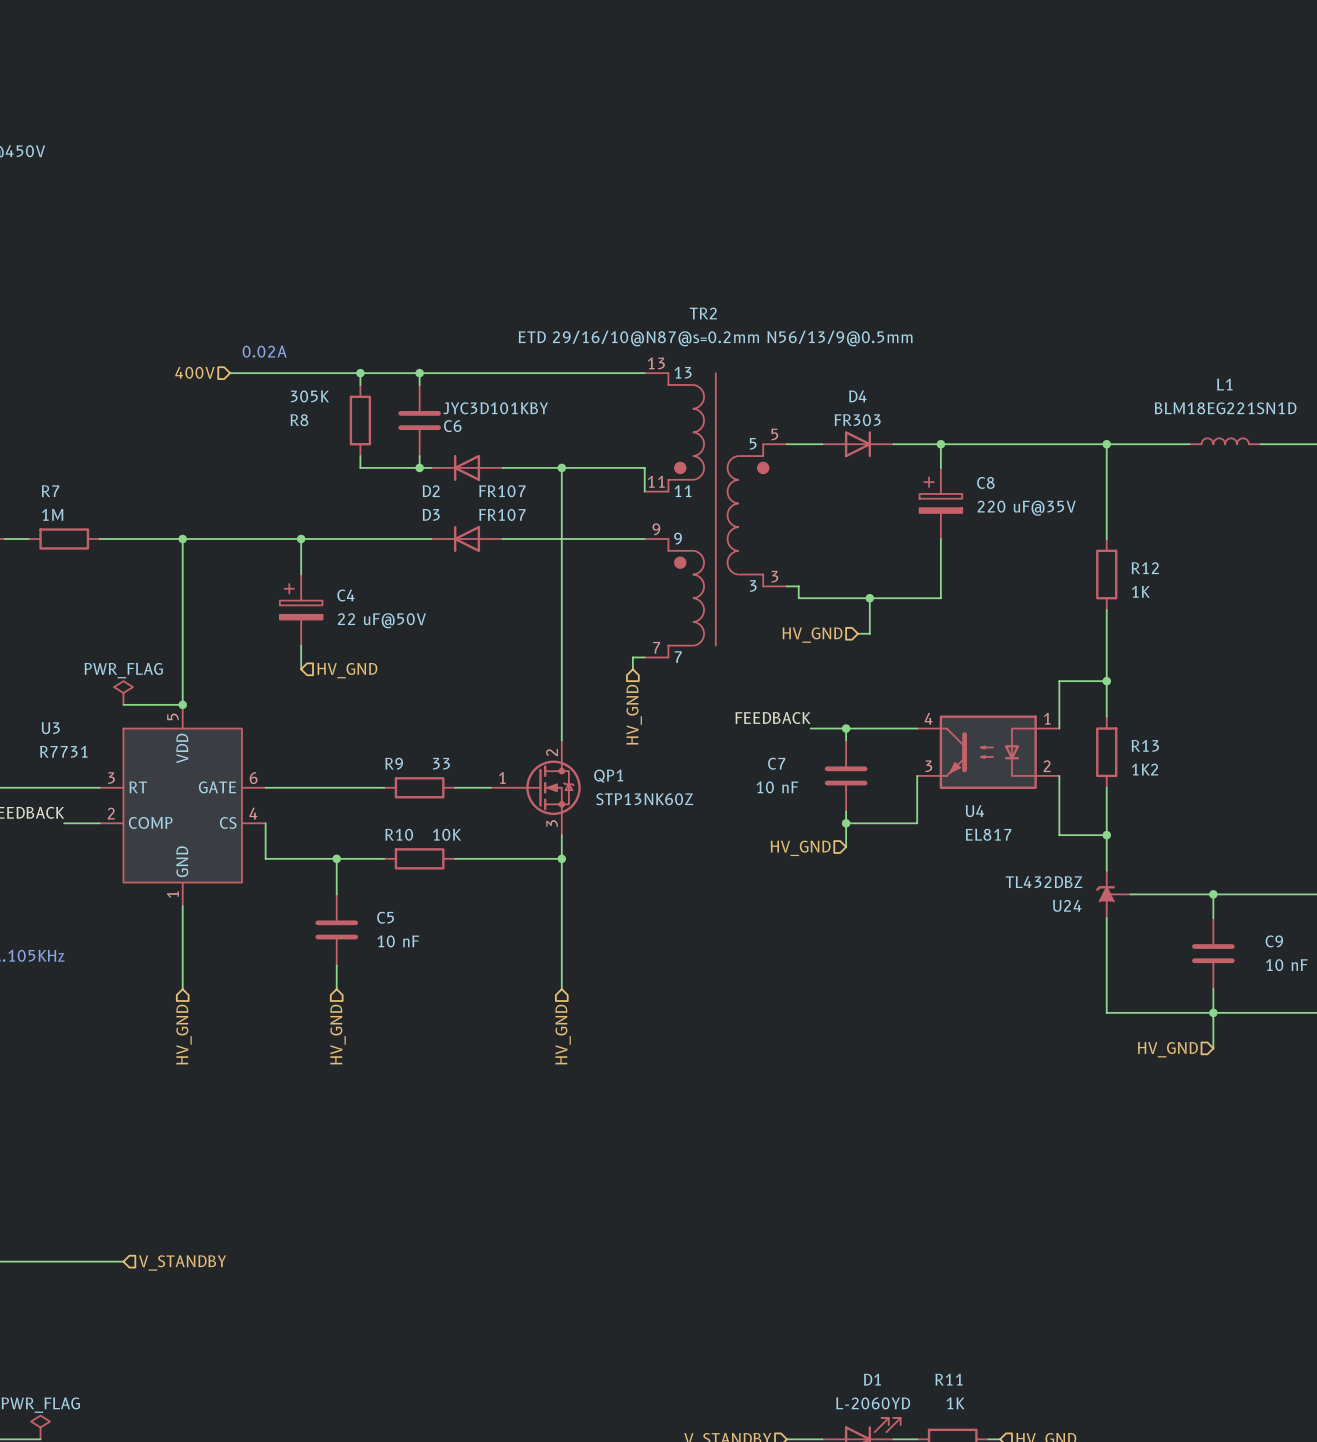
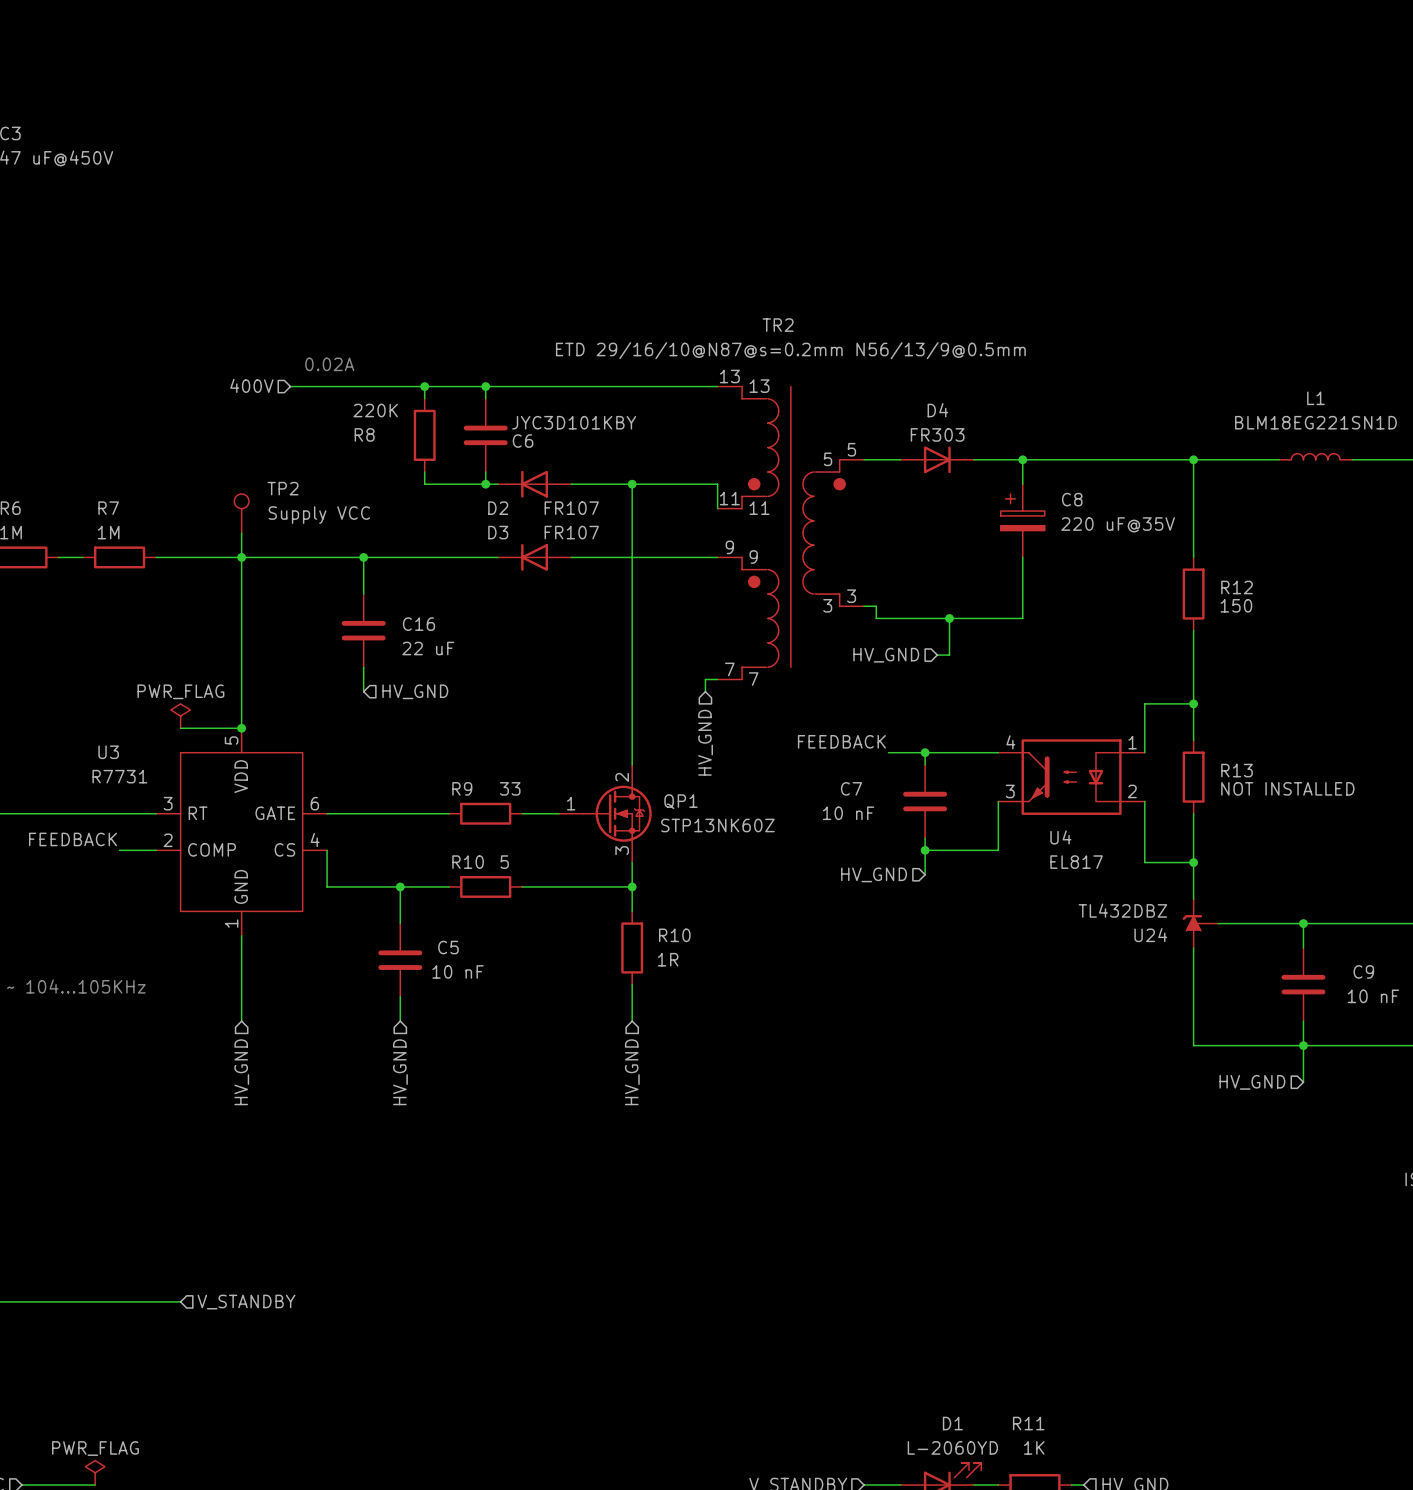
R8 value: 305K (309, 396) -> 220K (375, 410)
TP2: none -> Supply VCC (241, 513)
wire: none -> (241, 533) (241, 557)
R12 value: 1K (1140, 591) -> 150 (1236, 605)
C4: 22 uF@50V (301, 610) -> none
C16: none -> 22 uF (363, 630)
R13 value: 1K2 (1145, 769) -> NOT INSTALLED (1287, 788)
R10 value: 10K (447, 834) -> 5 (504, 862)
wire: (561, 882) (561, 953) -> none
R10: none -> 1R (632, 947)

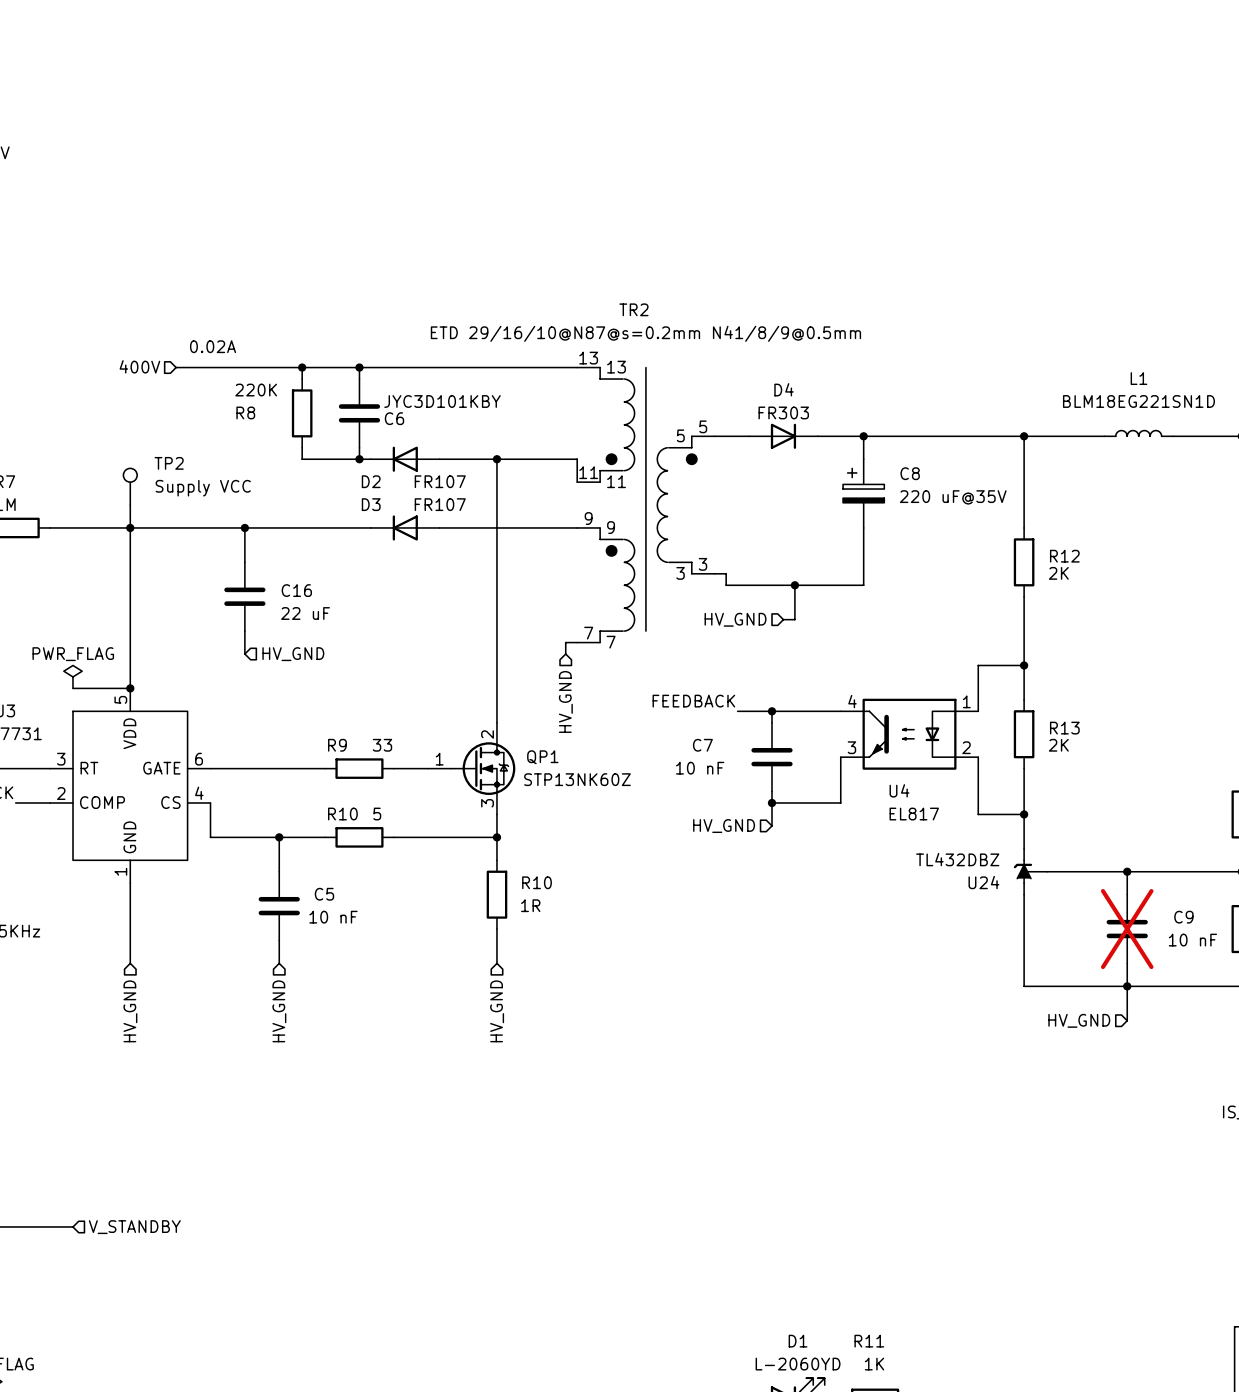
TR2 value: ETD 29/16/10@N87@s=0.2mm N56/13/9@0.5mm (790, 350) -> ETD 29/16/10@N87@s=0.2mm N41/8/9@0.5mm (645, 333)
R12 value: 150 (1236, 605) -> 2K (1058, 573)
R13 value: NOT INSTALLED (1287, 788) -> 2K (1058, 745)
C9 do-not-place cross: none -> (1127, 929)

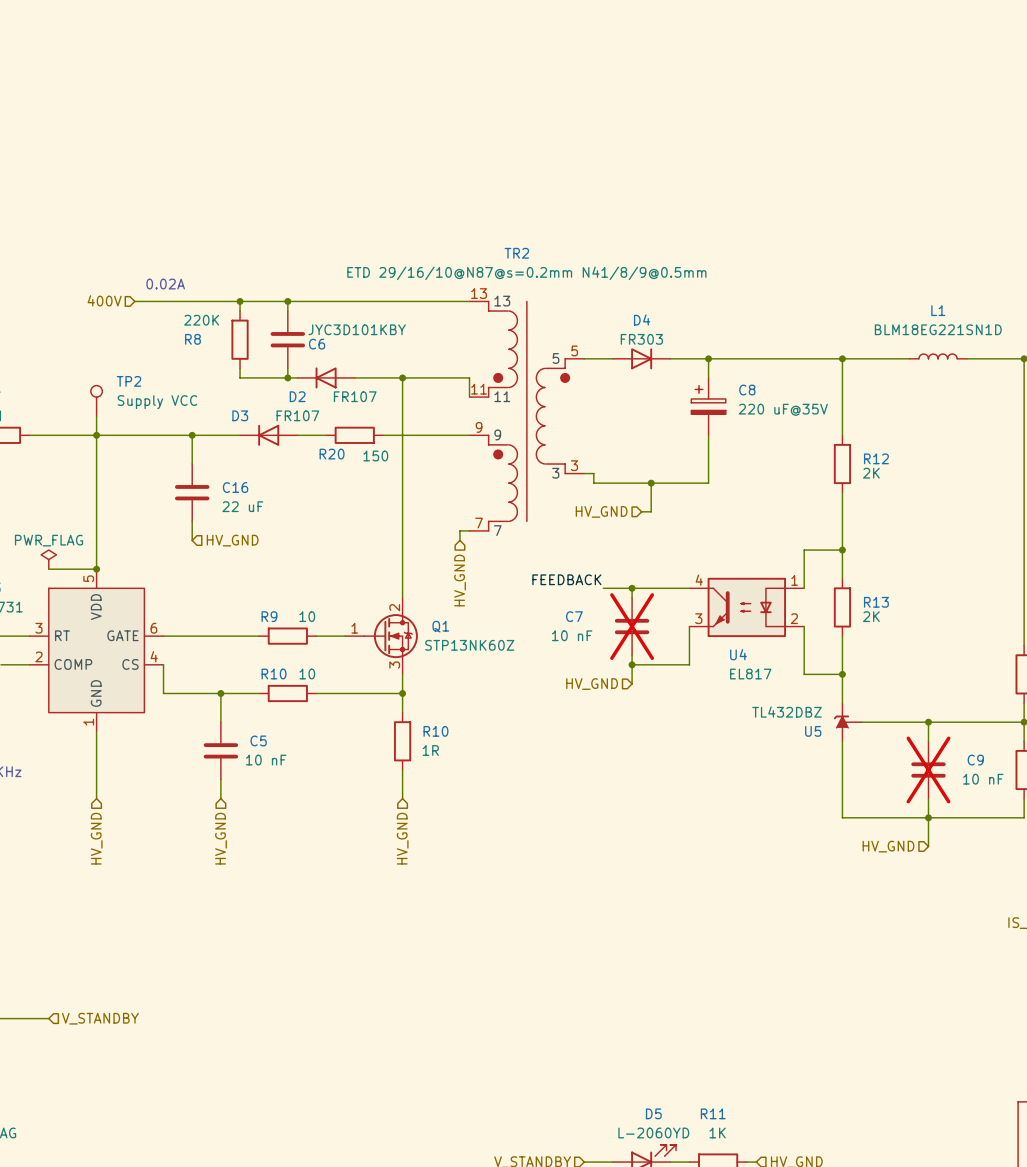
D3 position: (405, 527) -> (268, 435)
wire: (439, 527) (474, 527) -> none
R20: none -> 150 (354, 435)
R9 value: 33 (382, 745) -> 10 (307, 616)
QP1 name: QP1 (542, 757) -> Q1 (440, 626)
C7 do-not-place cross: none -> (632, 626)
R10 value: 5 (377, 814) -> 10 (307, 674)
U24 name: U24 (983, 882) -> U5 (813, 731)
D1 name: D1 (798, 1341) -> D5 (653, 1113)

